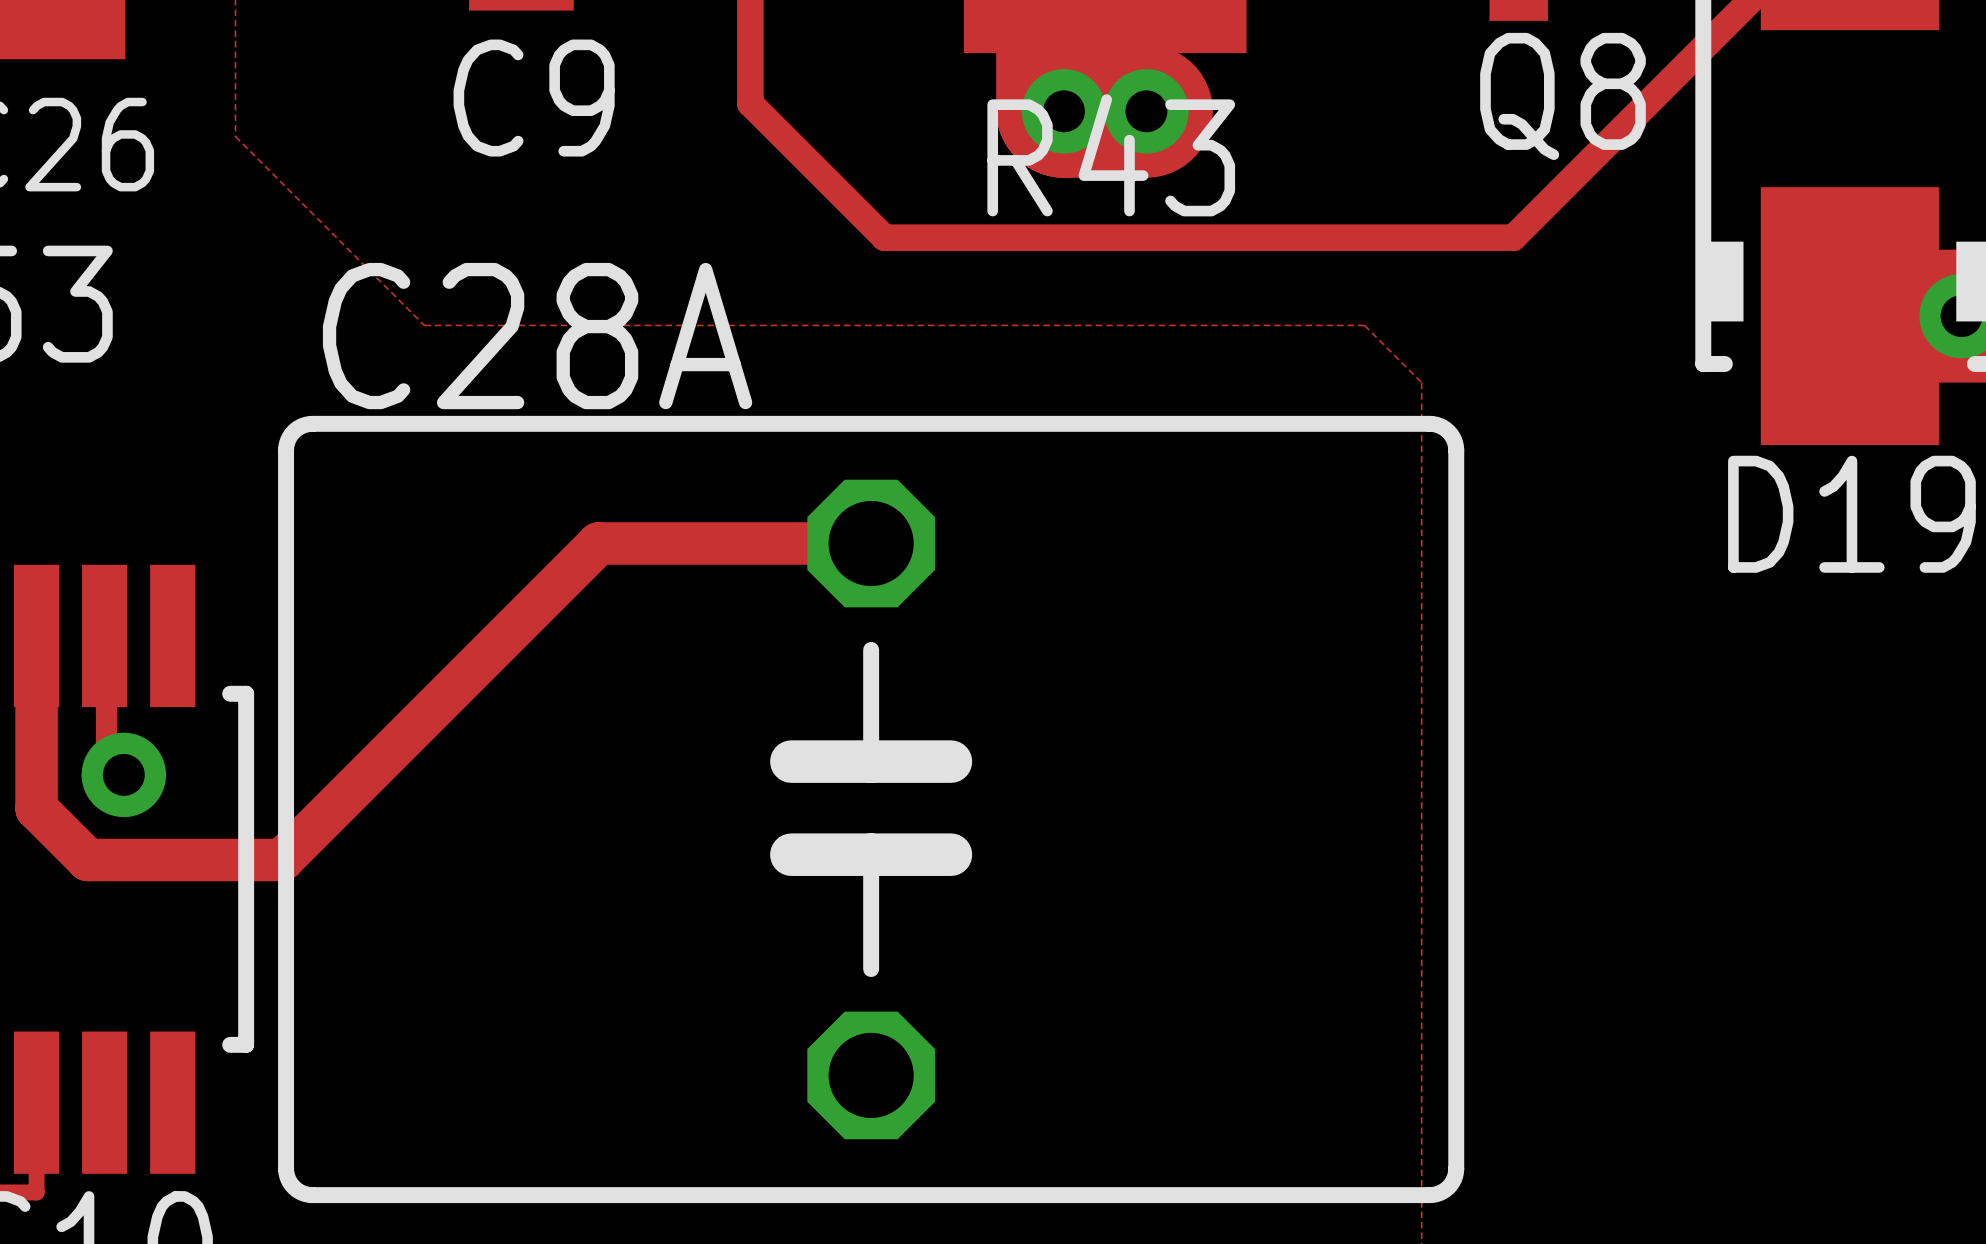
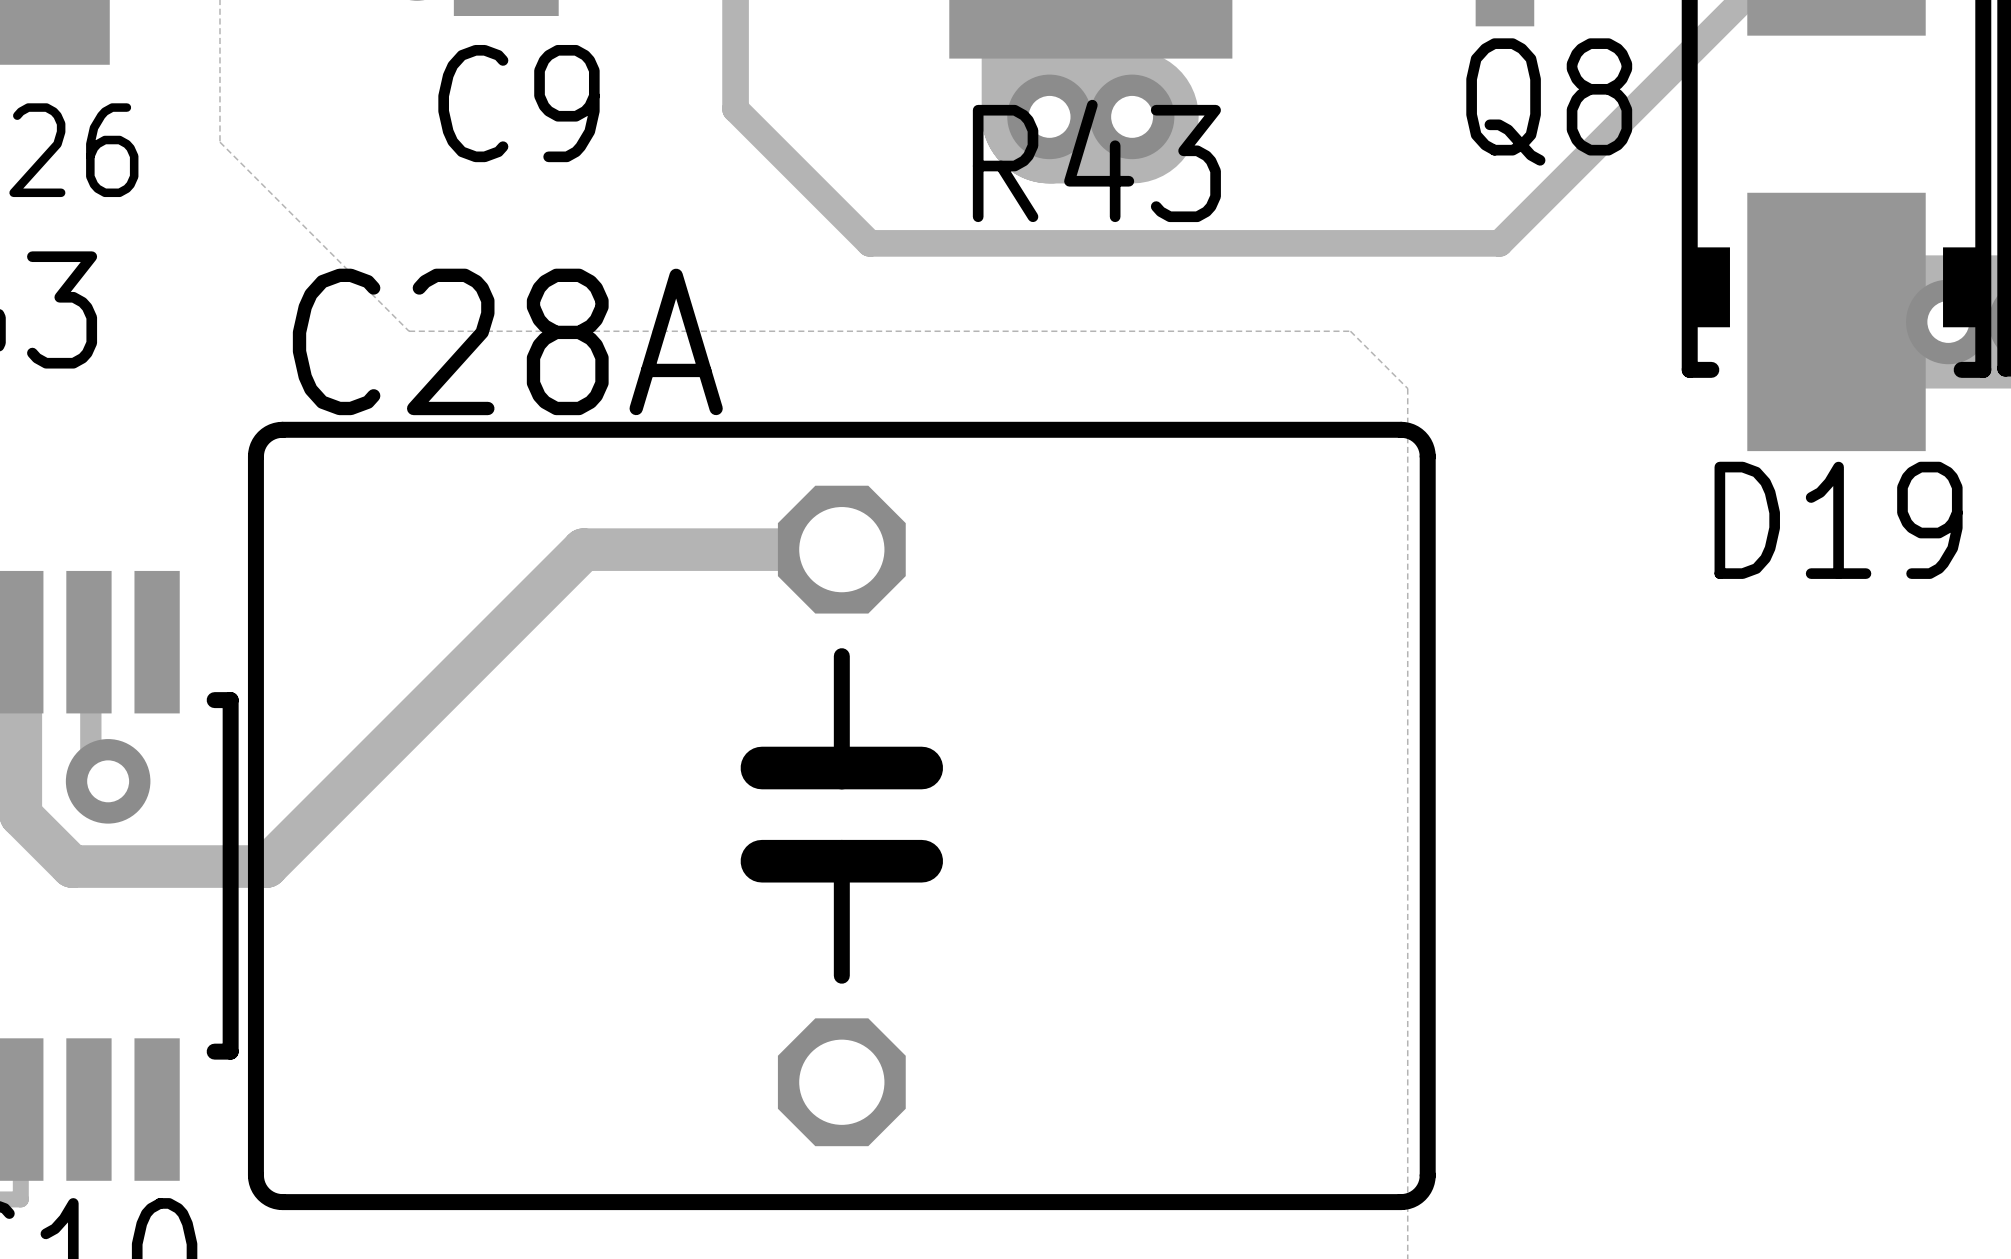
C28A position: (871, 809) -> (841, 815)

